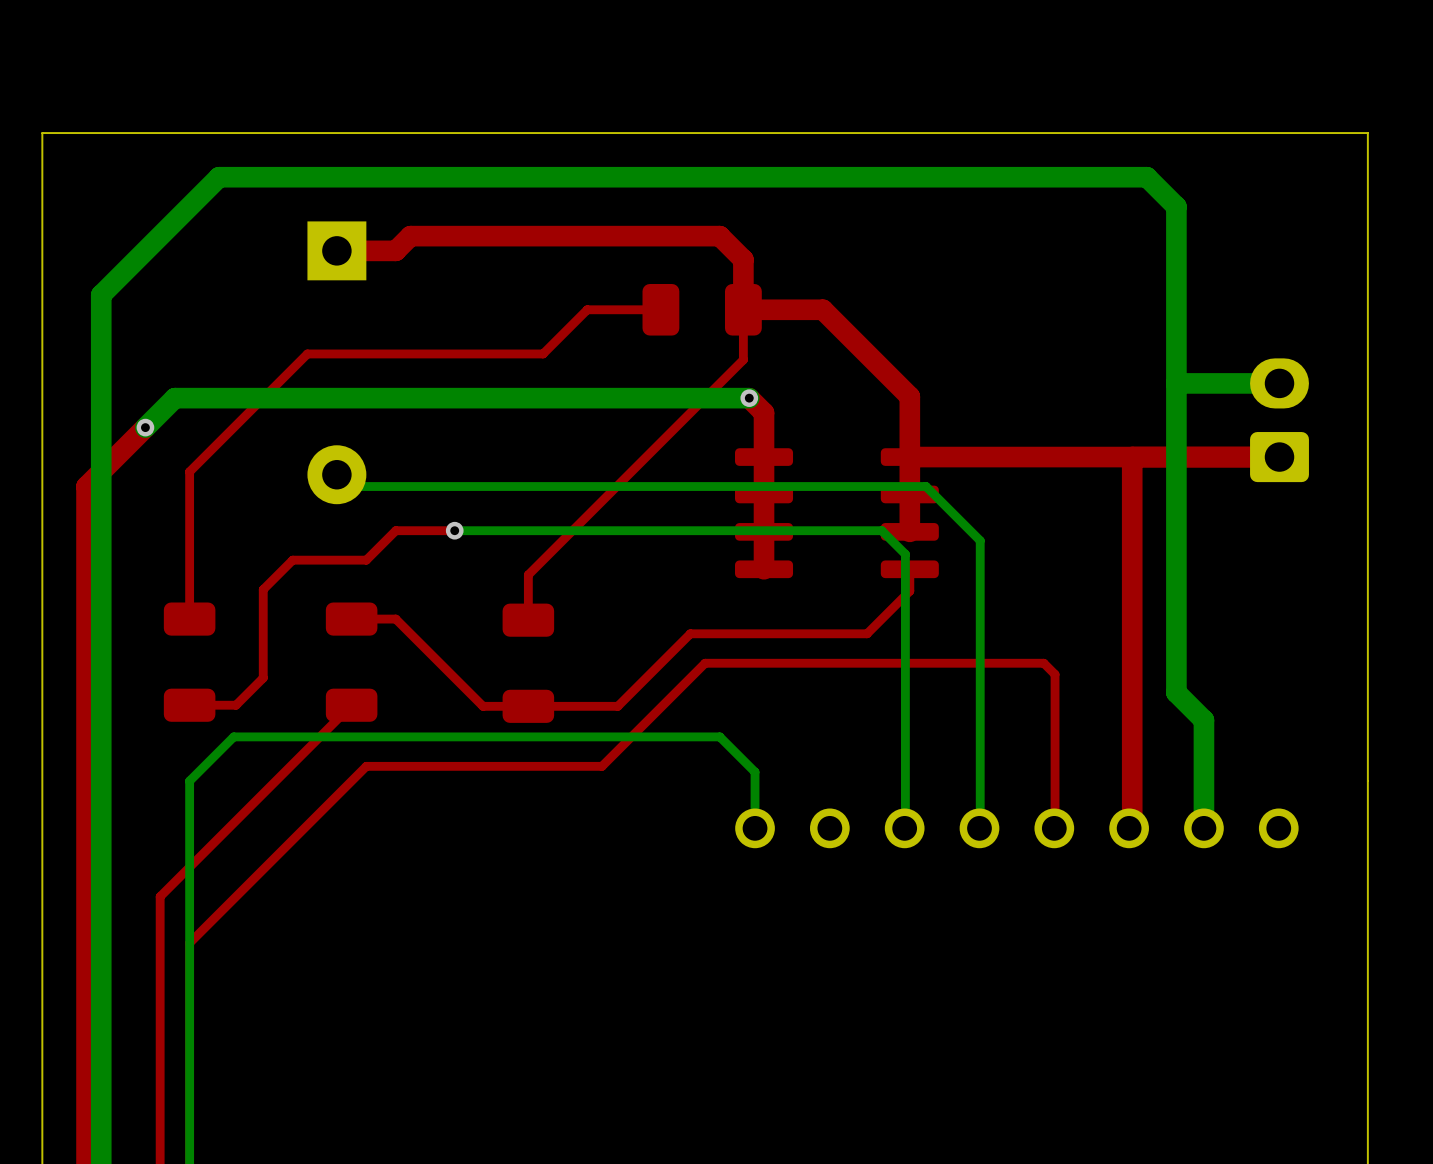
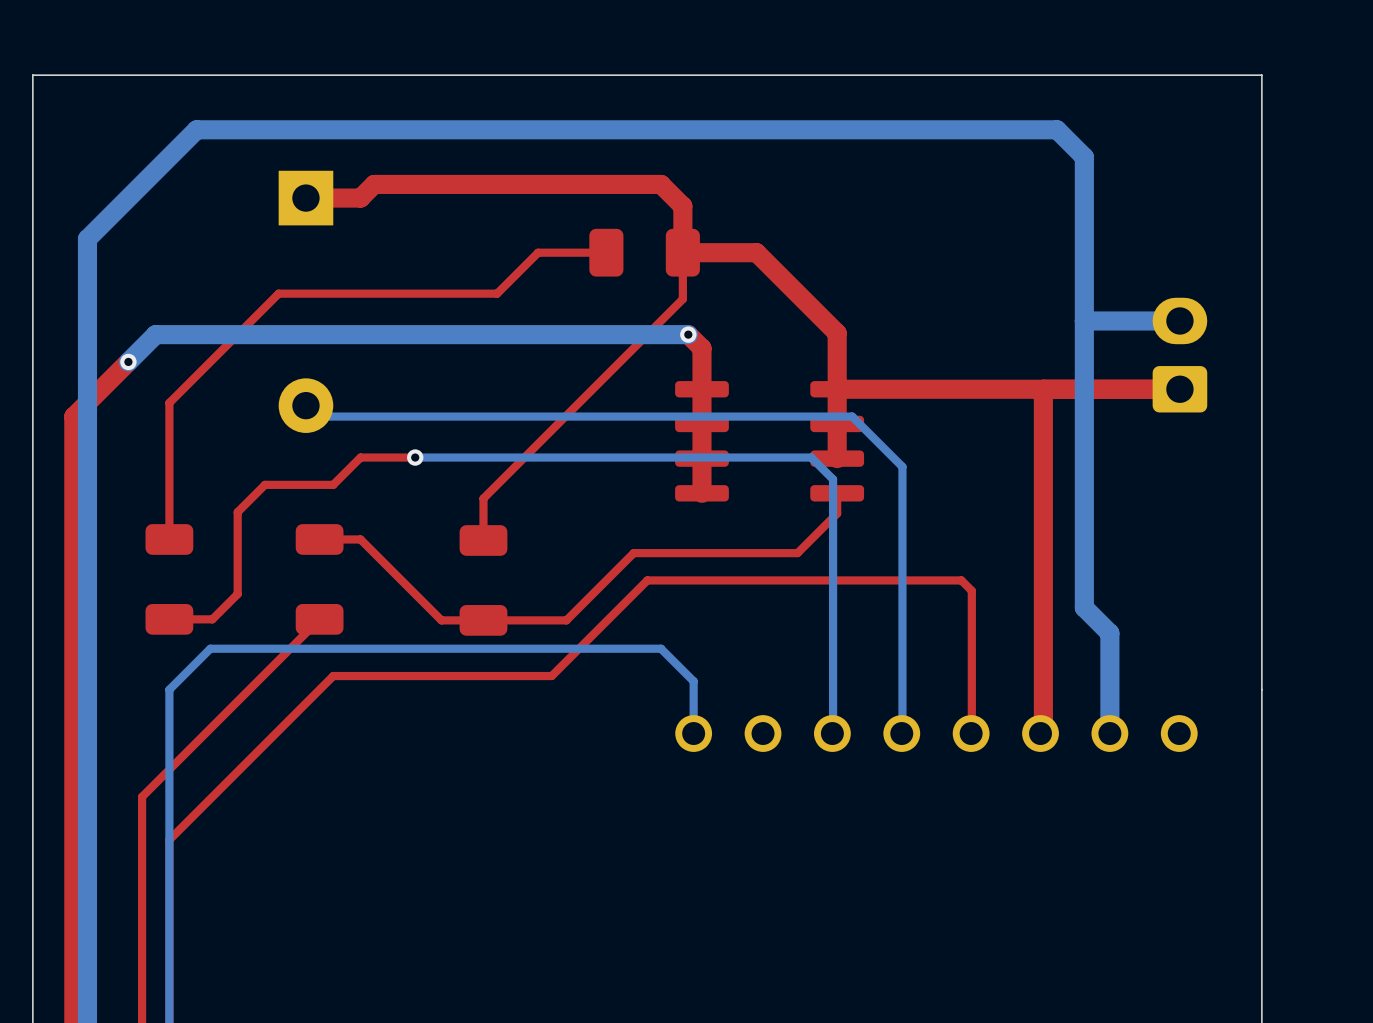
board edge: (1367, 133) (42, 133) -> (1261, 88) (1261, 75) (32, 75) (32, 88)

